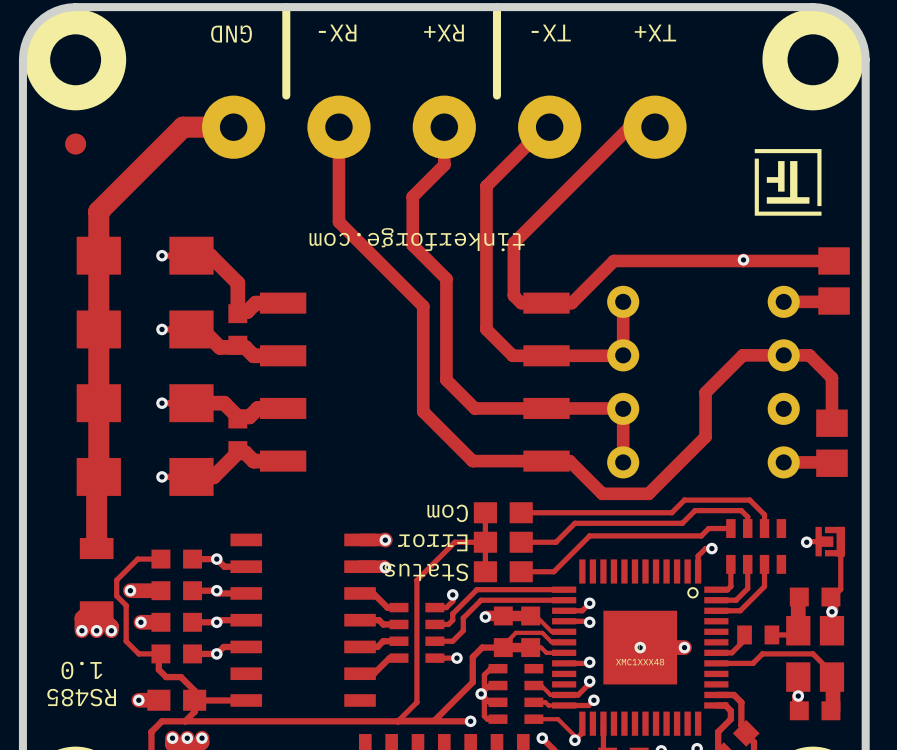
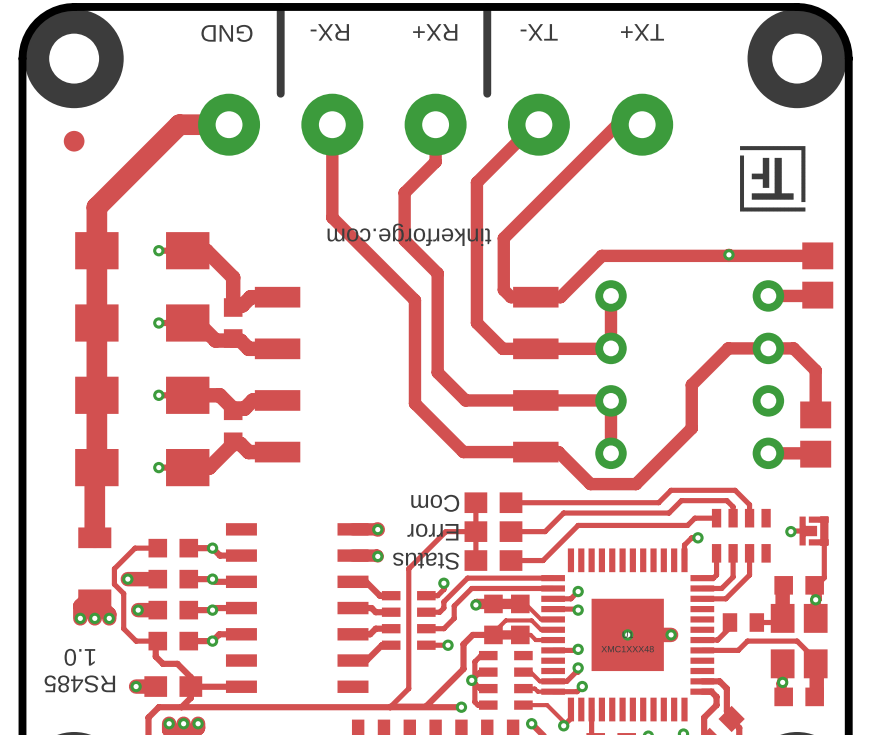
part footprint: [552, 559, 729, 736] -> [541, 548, 715, 722]

